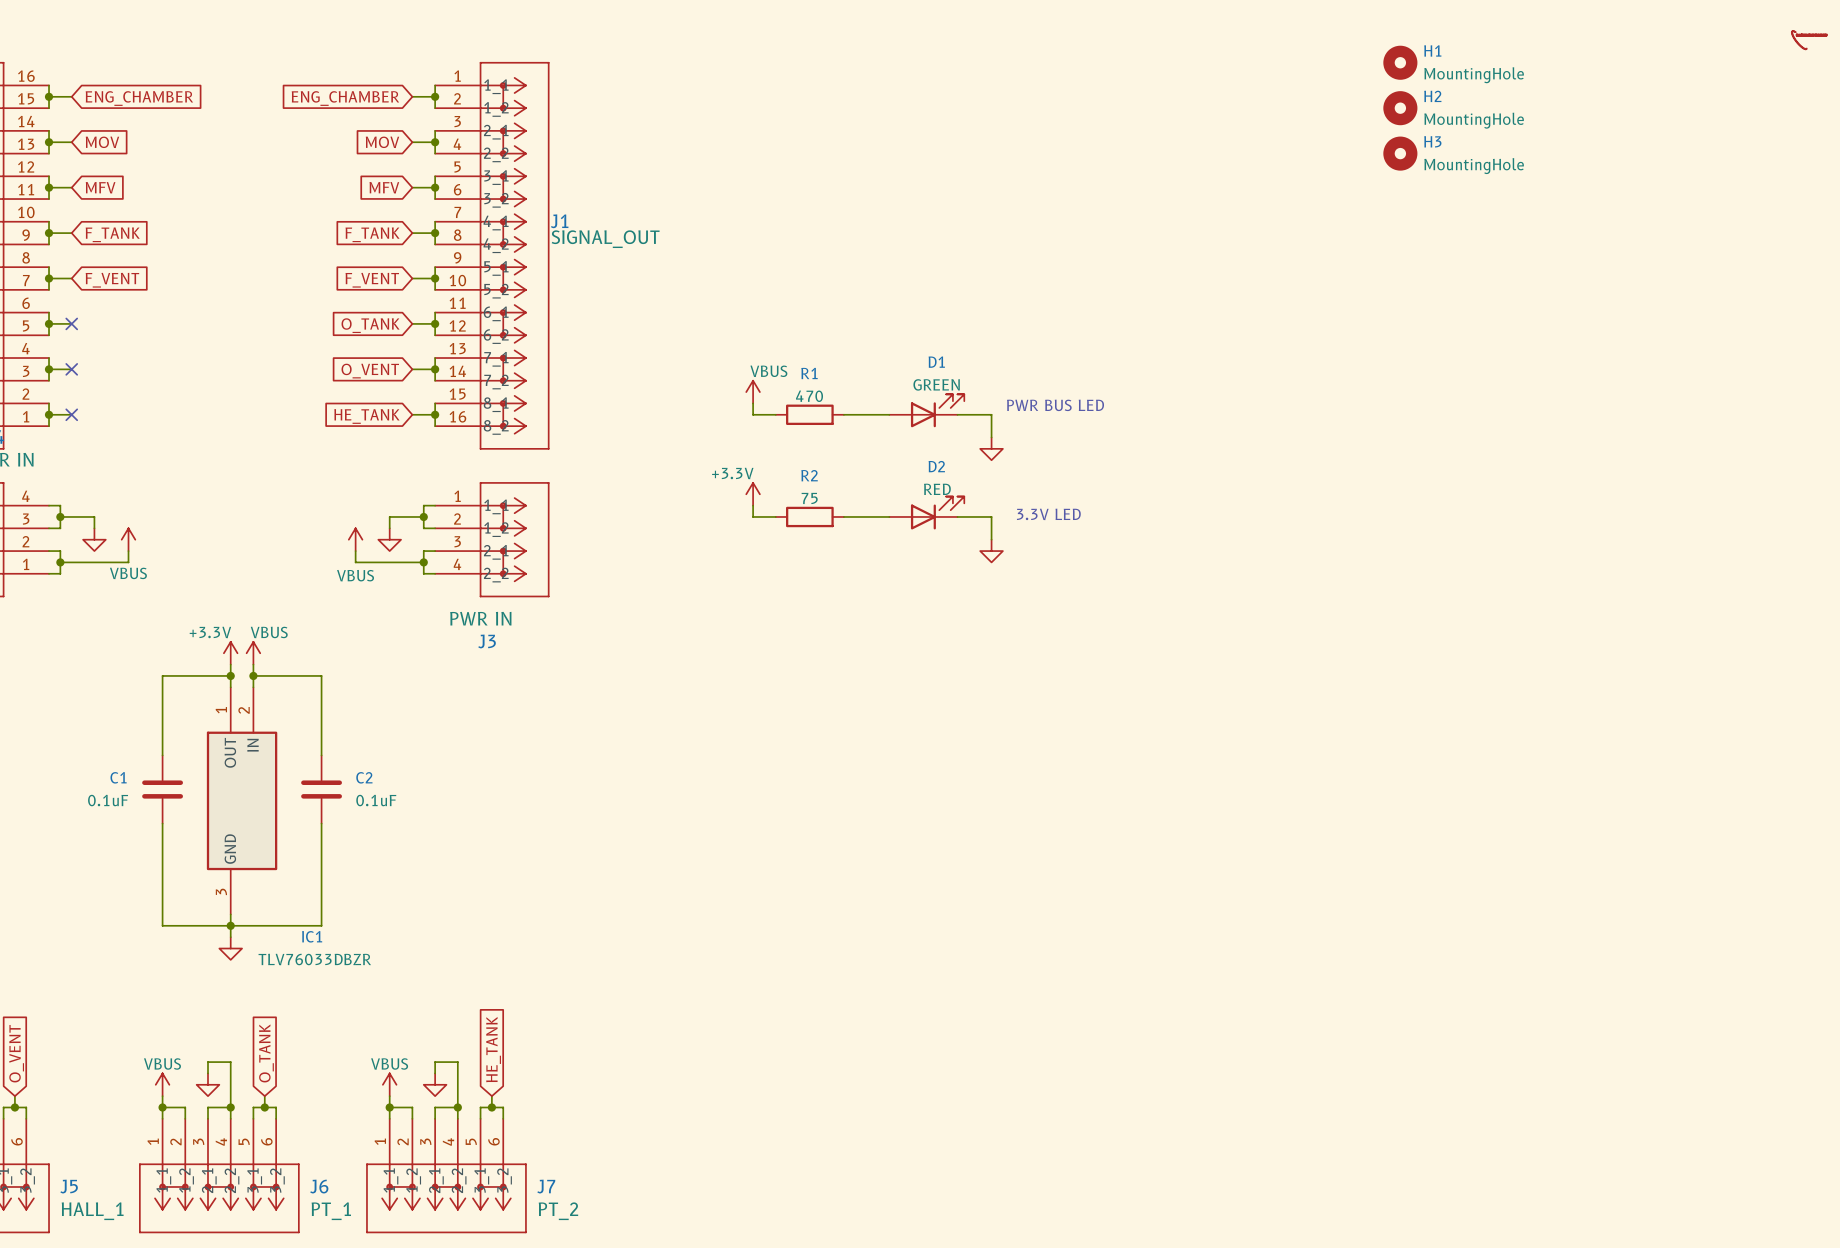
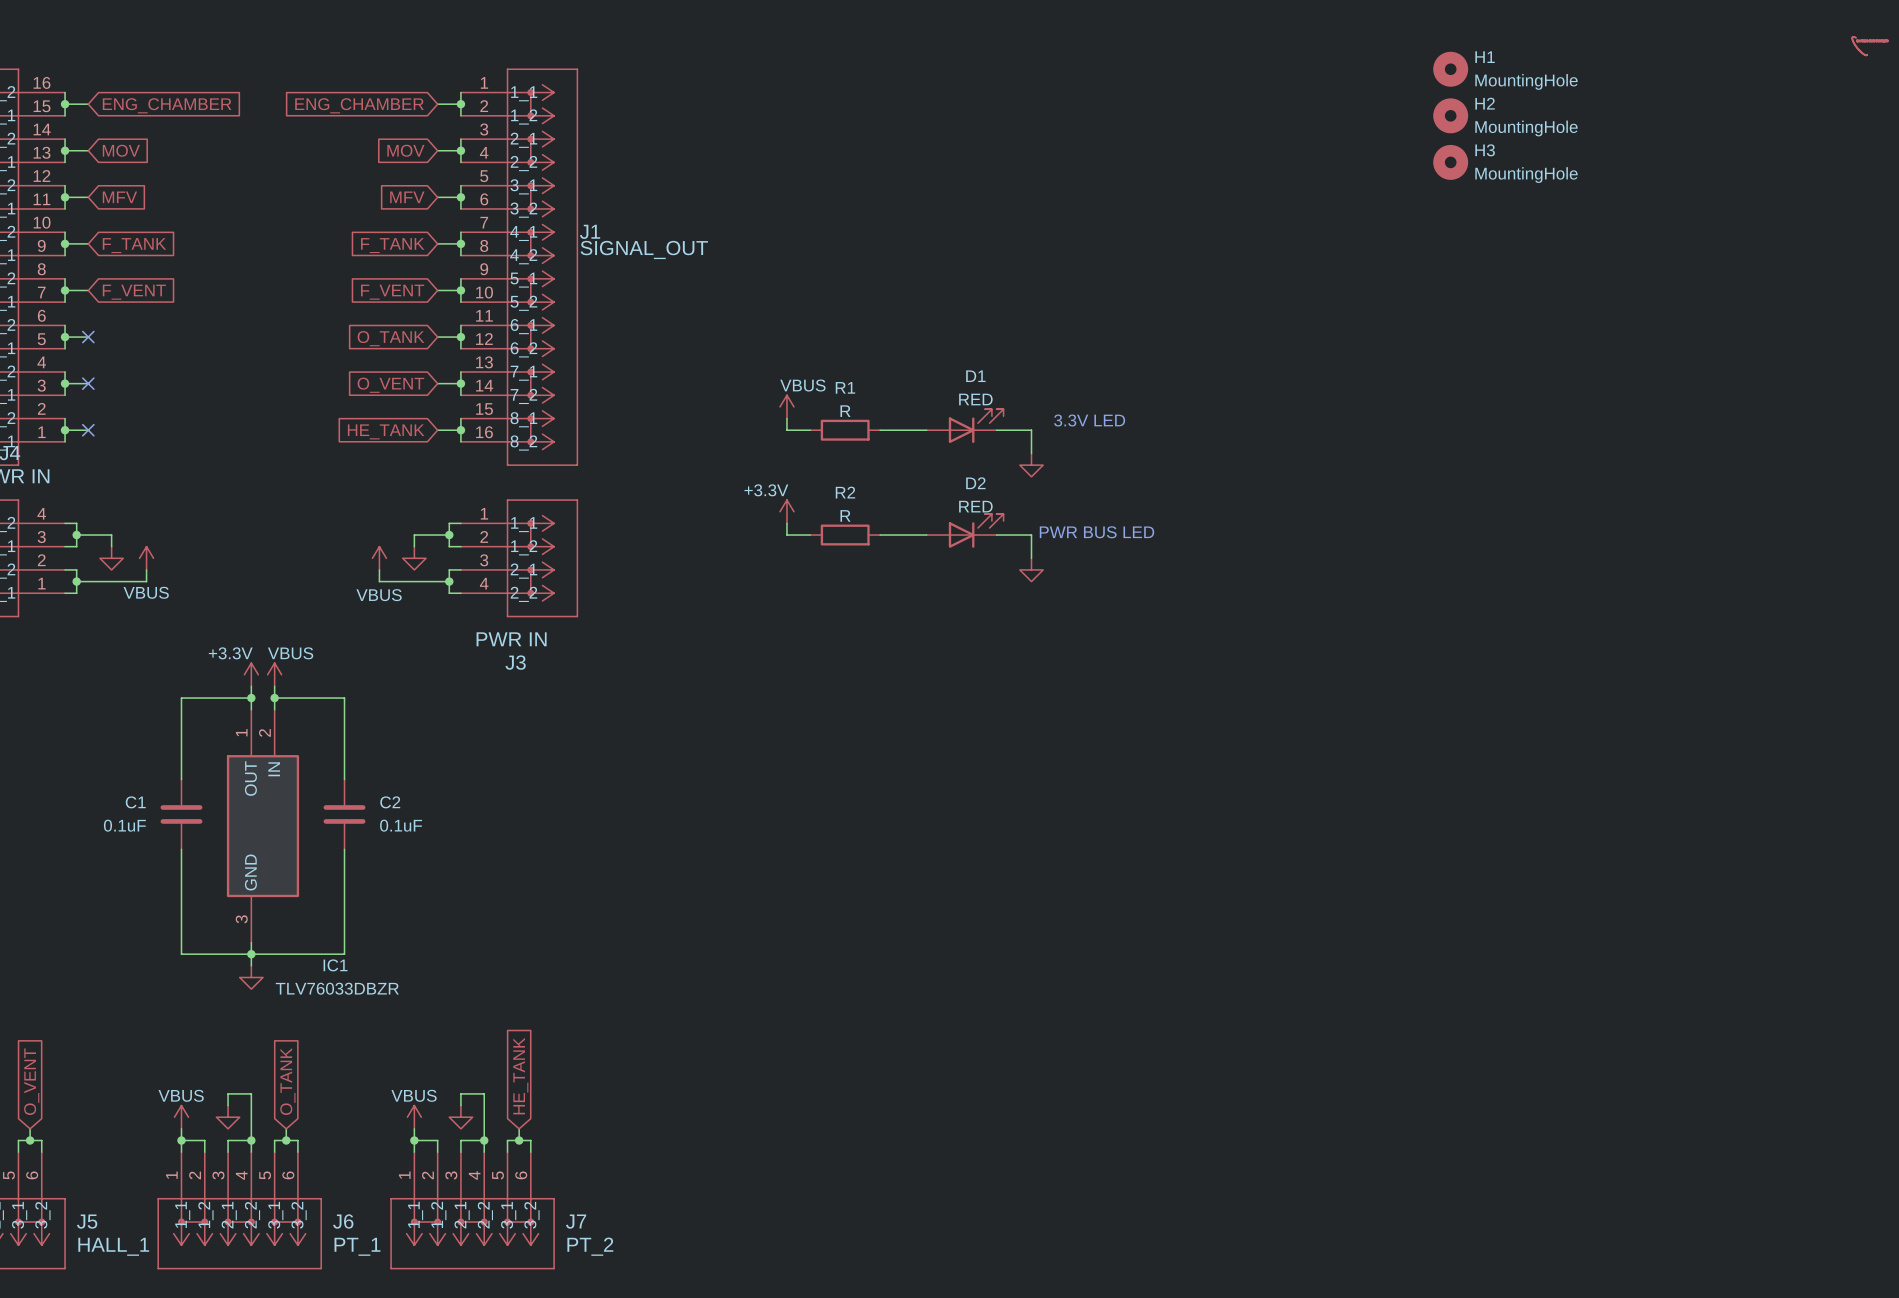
D1 value: GREEN (936, 384) -> RED (975, 399)
R1 value: 470 (809, 396) -> R (845, 411)
text: PWR BUS LED (1055, 405) -> 3.3V LED (1089, 420)
R2 value: 75 (809, 498) -> R (845, 515)
text: 3.3V LED (1048, 514) -> PWR BUS LED (1096, 532)

